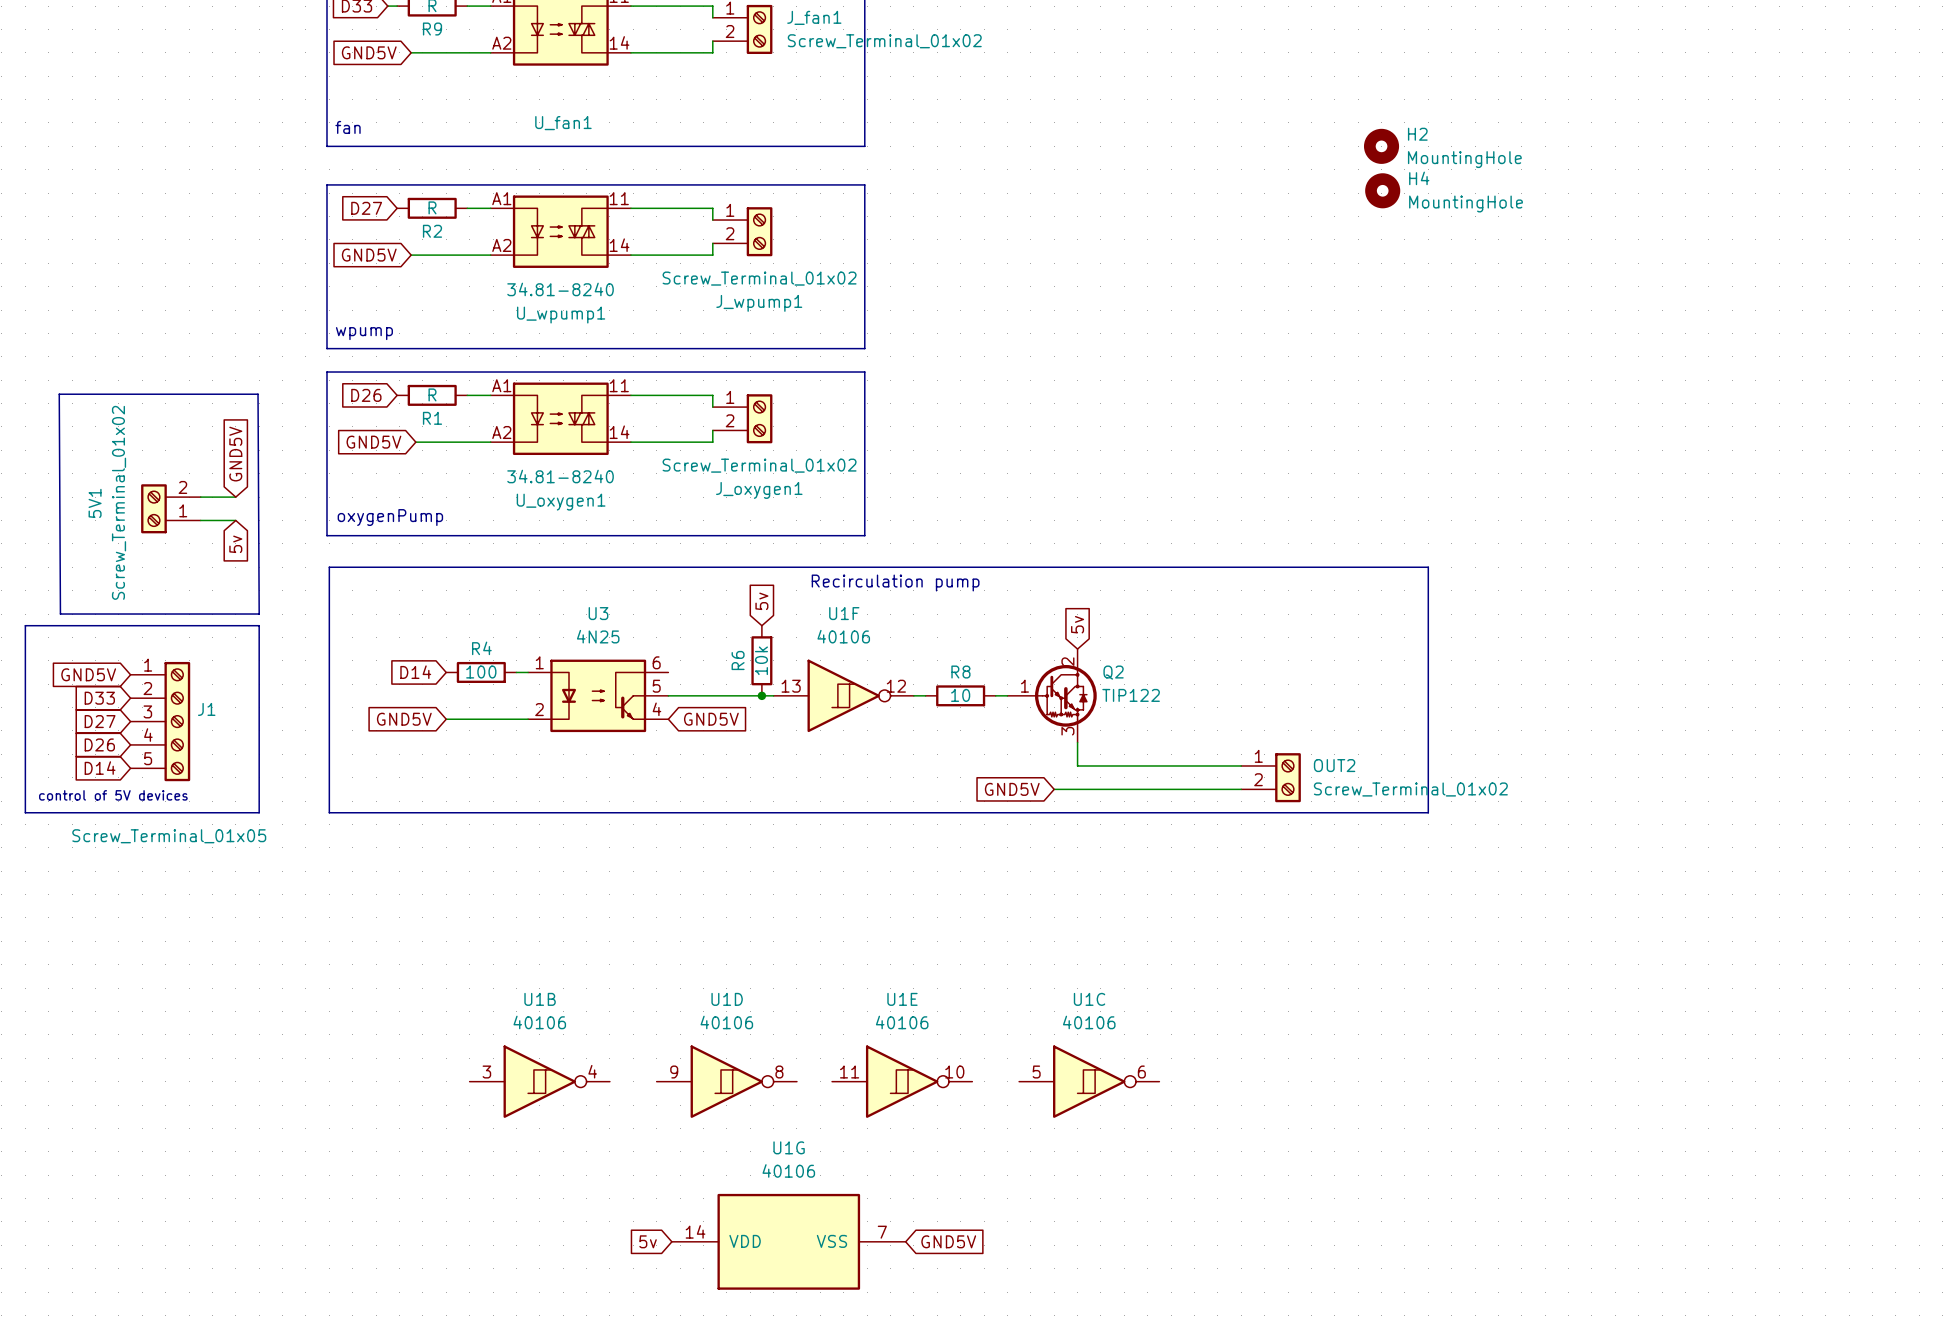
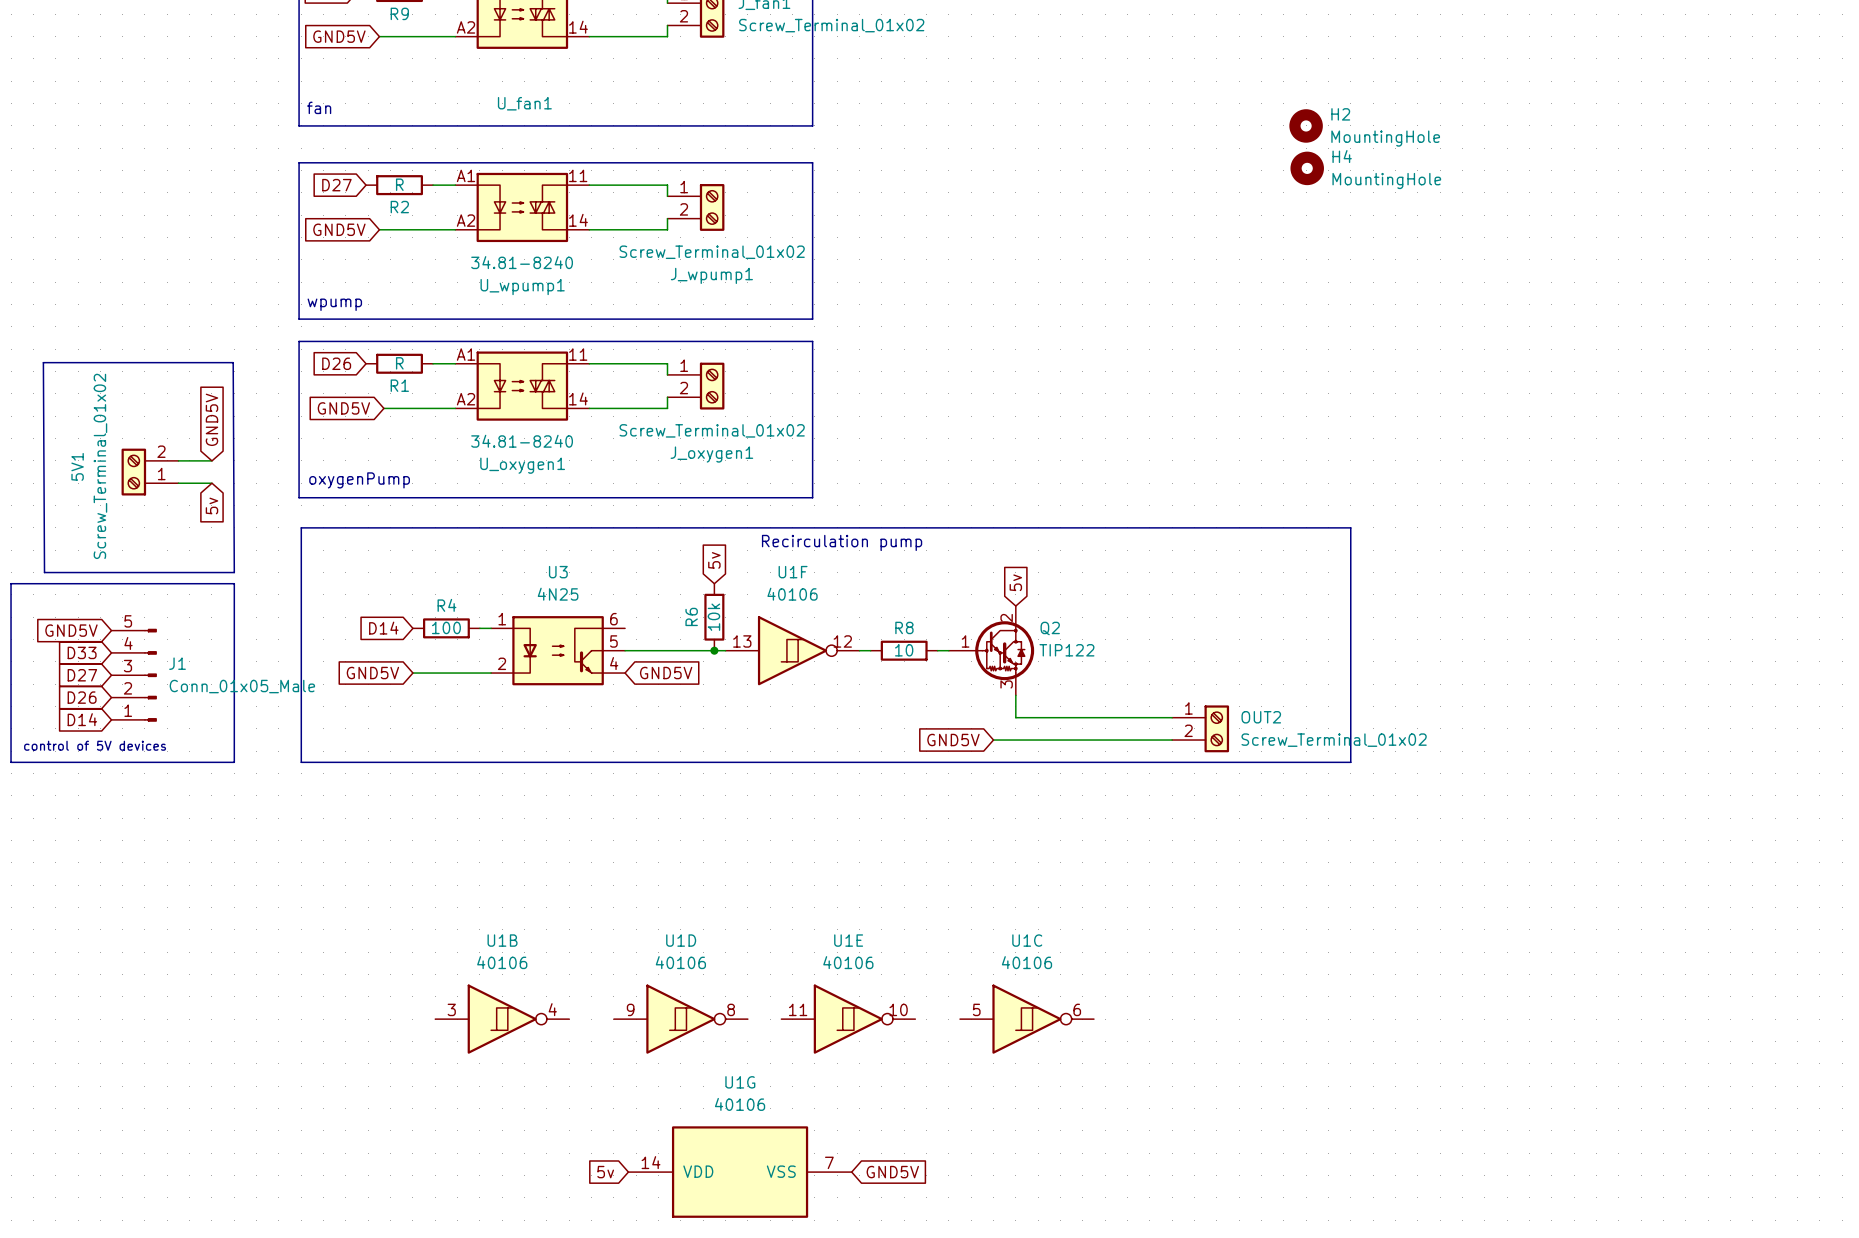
J1 symbol: [130, 661, 191, 782] -> [111, 628, 157, 722]
J1 value: Screw_Terminal_01x05 (169, 836) -> Conn_01x05_Male (242, 686)

